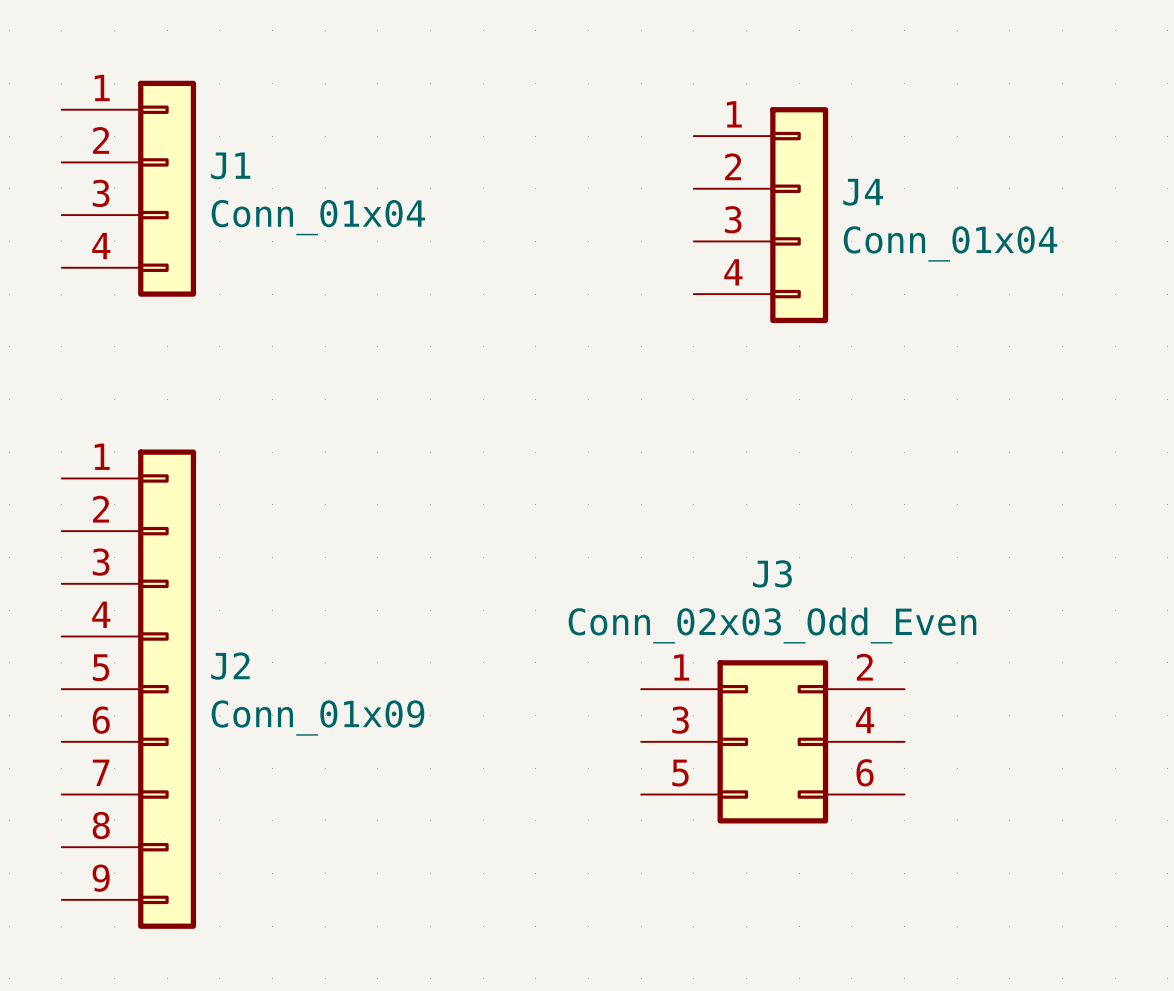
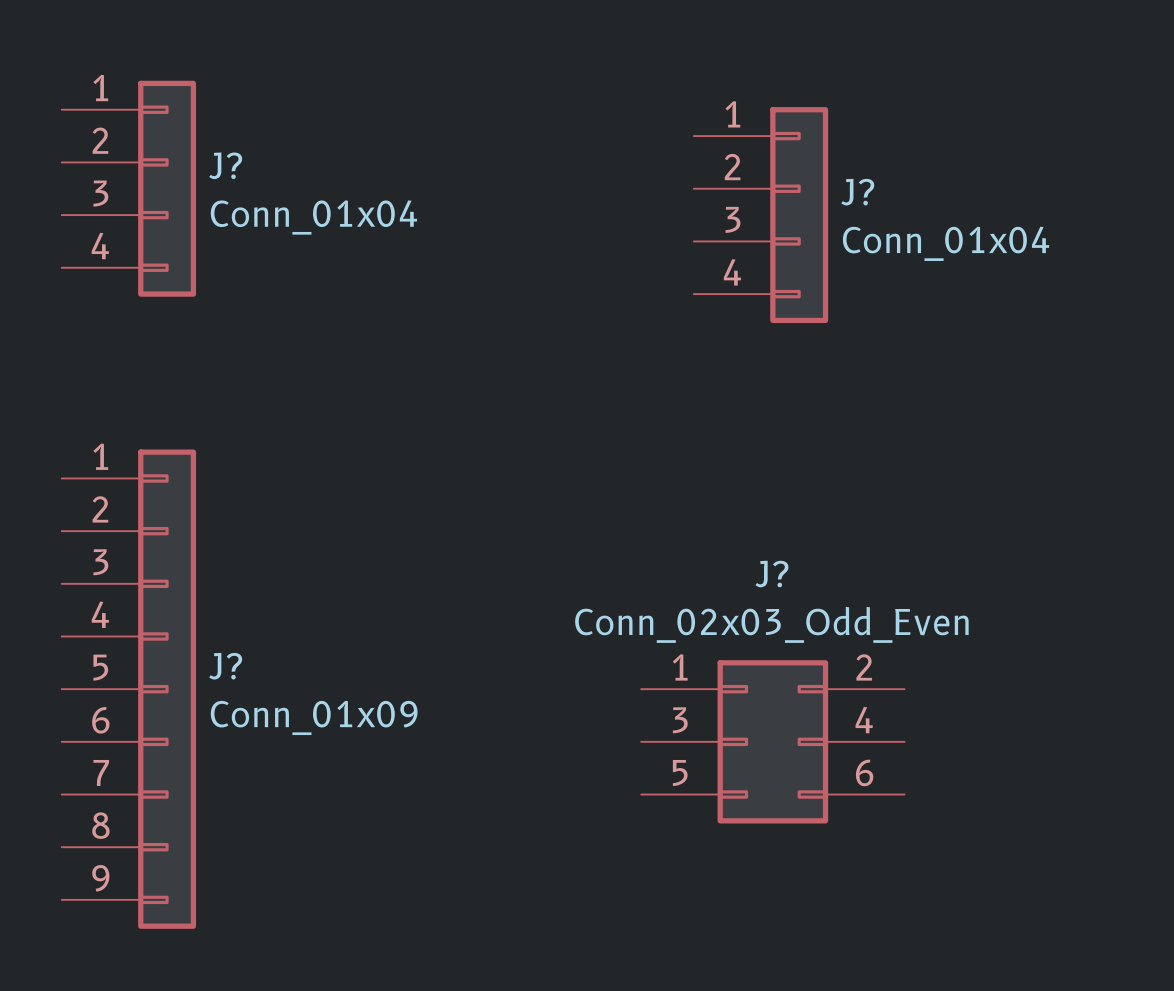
J1 name: J1 (230, 165) -> J? (225, 165)
J4 name: J4 (863, 192) -> J? (857, 192)
J3 name: J3 (772, 573) -> J? (771, 574)
J2 name: J2 (230, 666) -> J? (225, 666)

